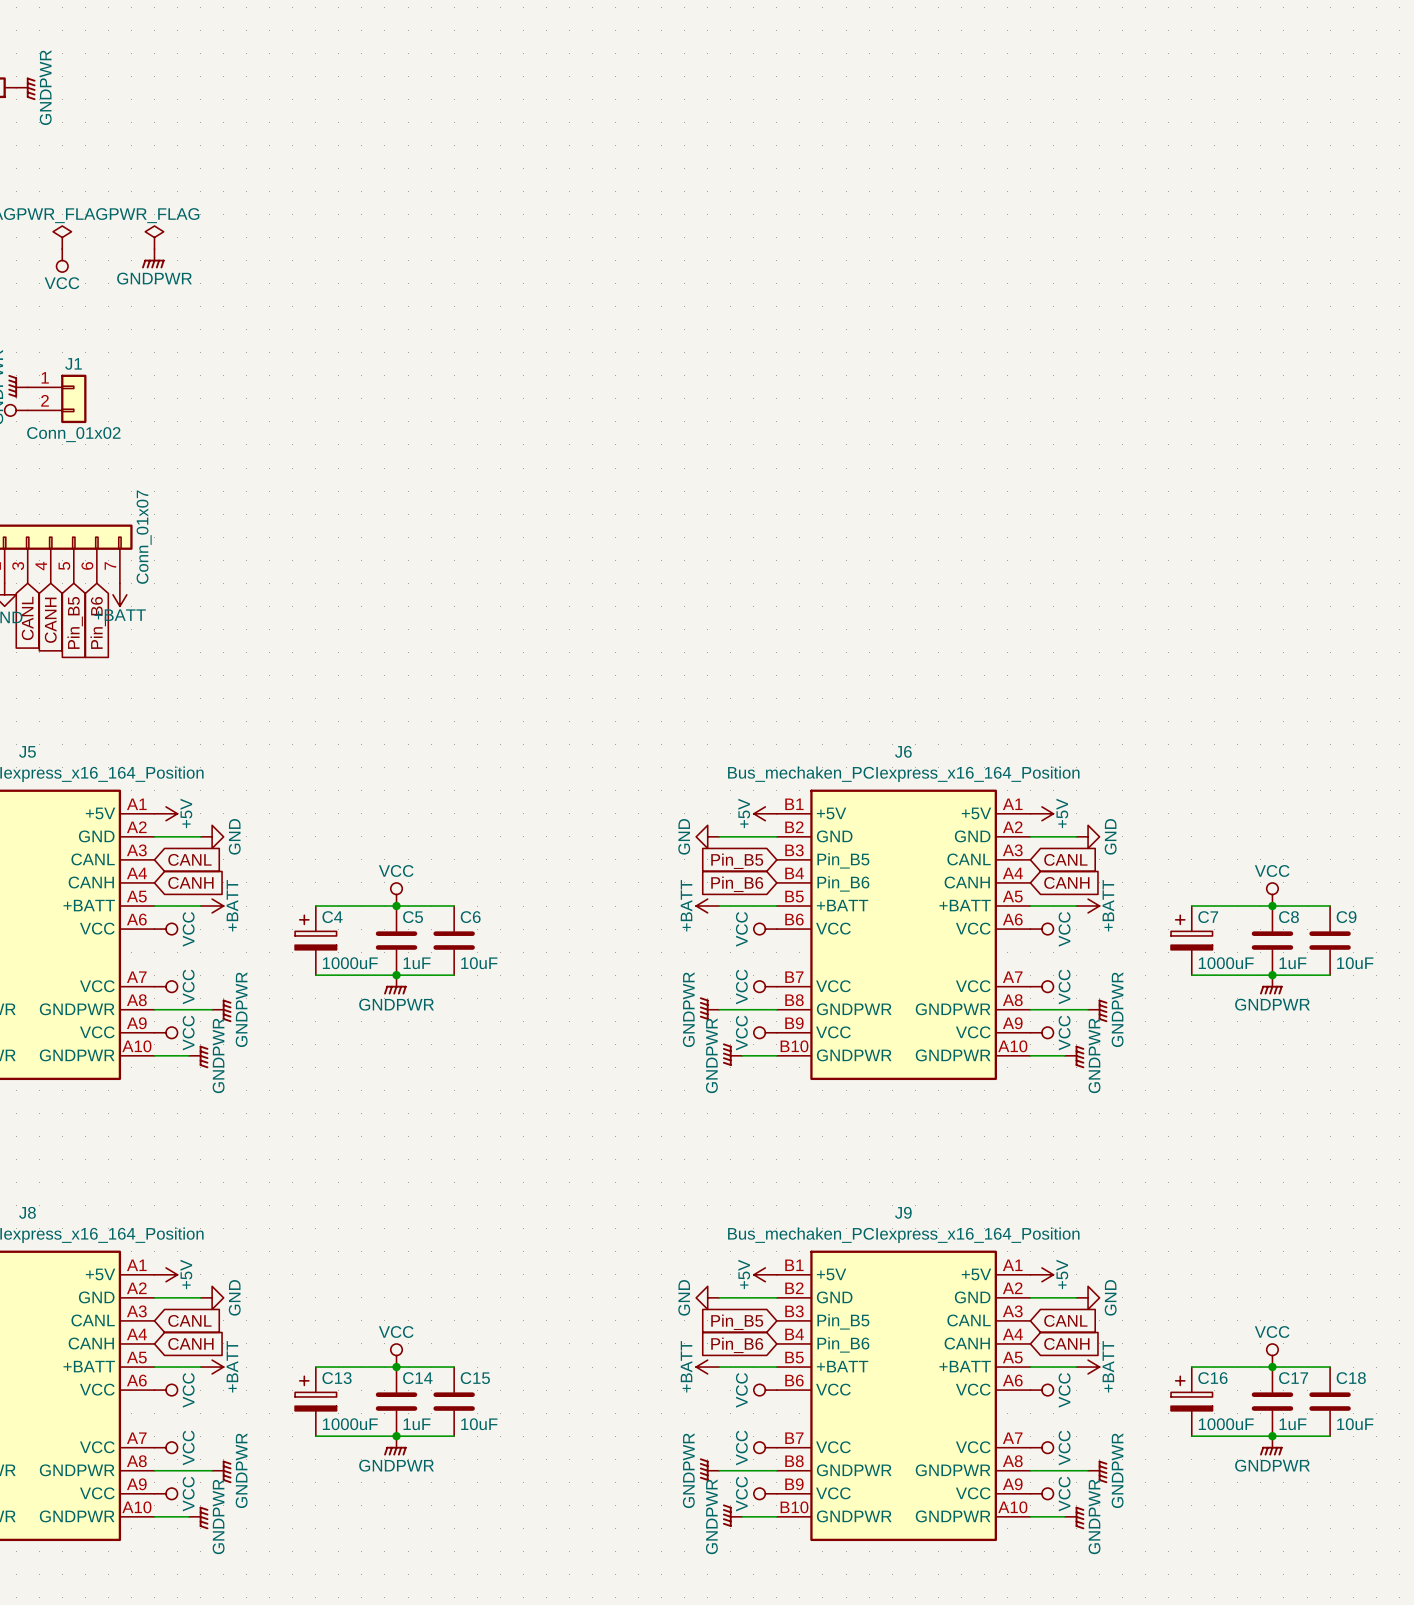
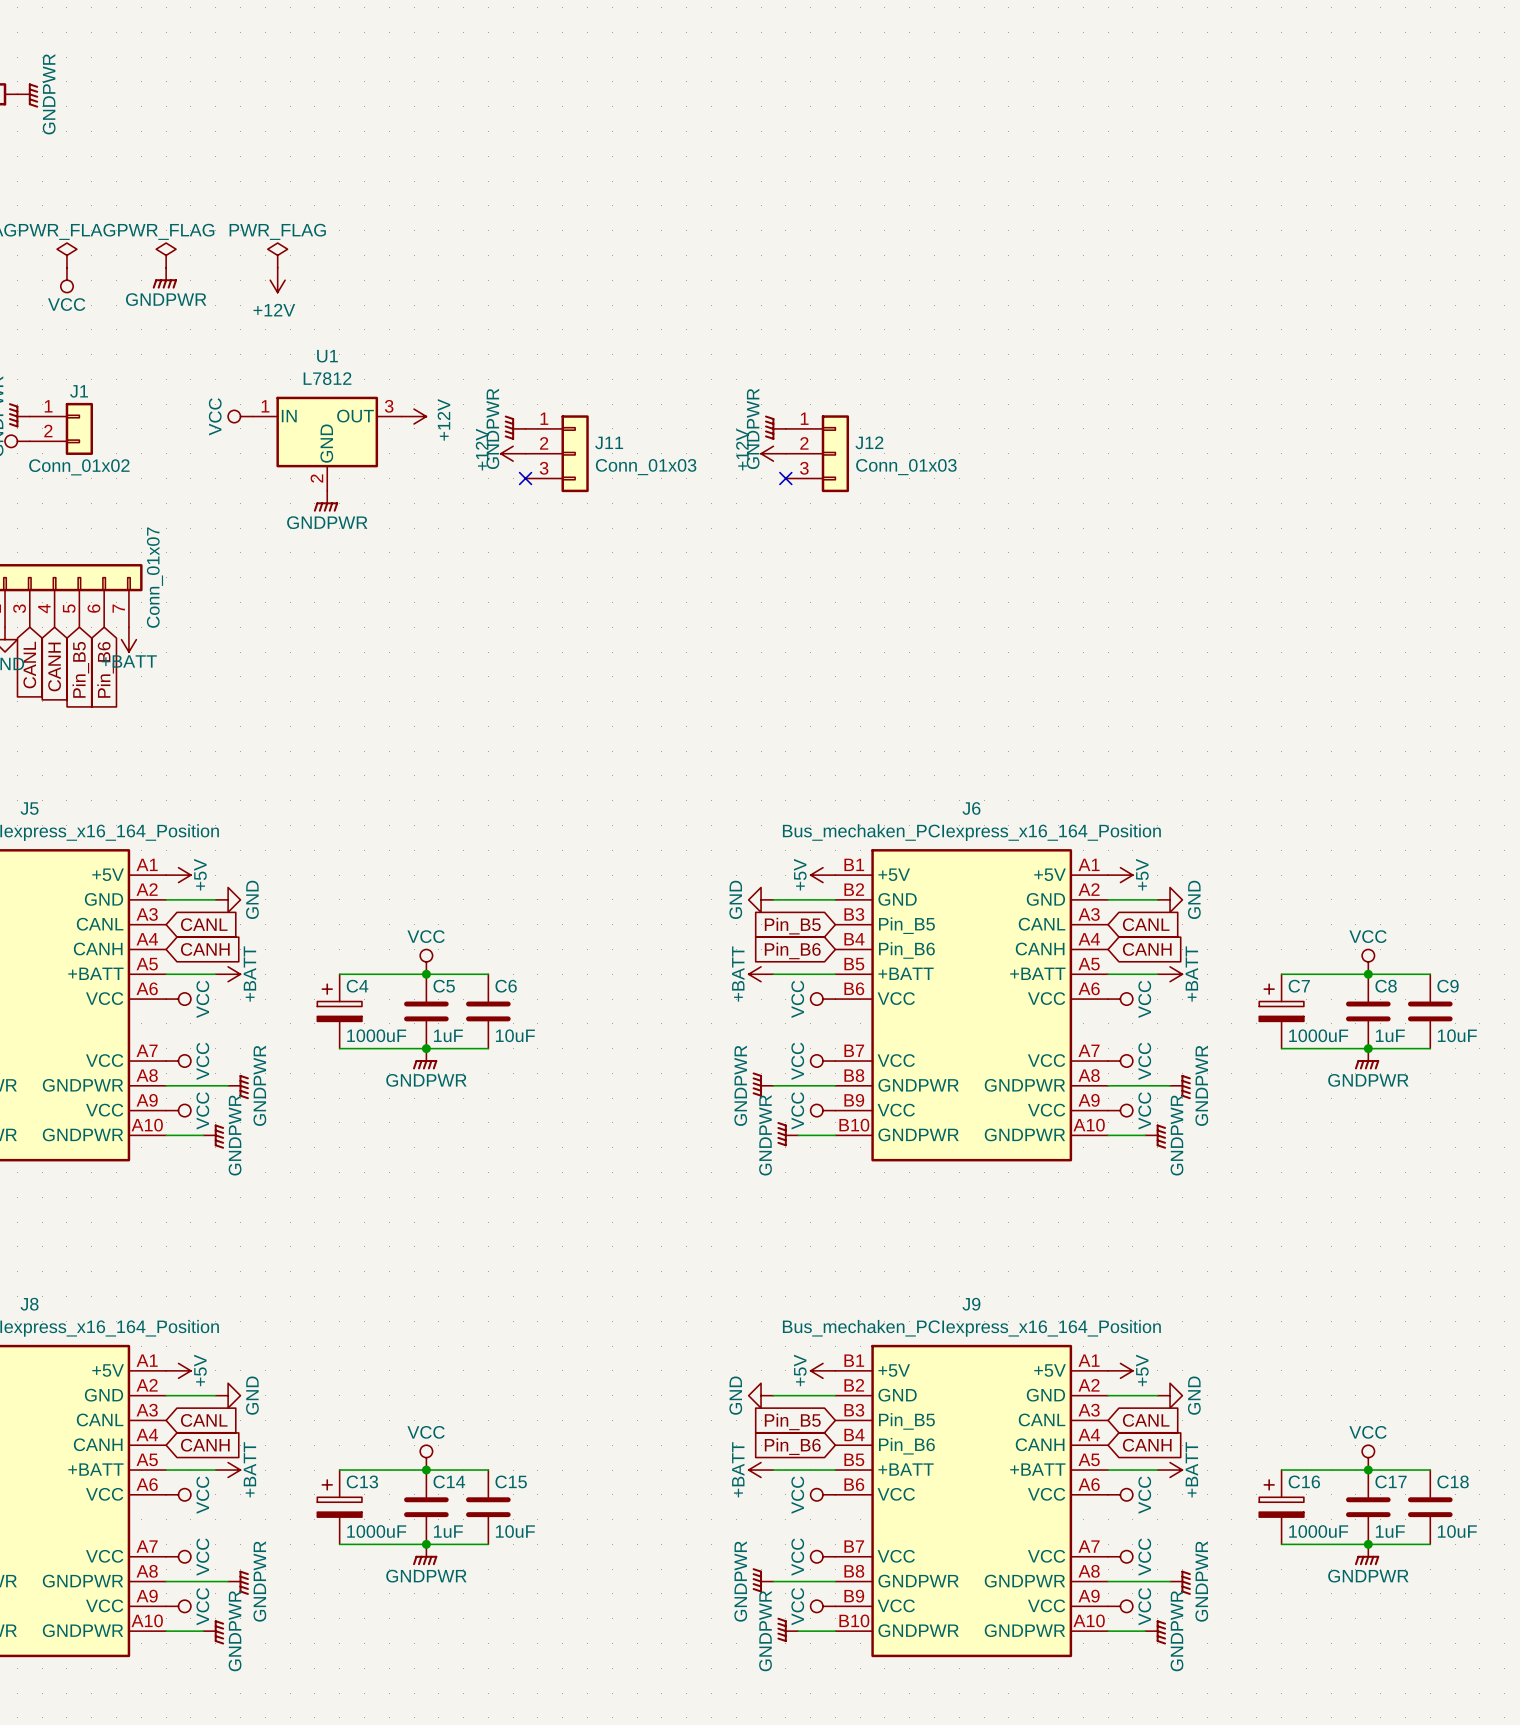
power symbol: none -> PWR_FLAG (277, 255)
power symbol: none -> +12V (277, 280)
power symbol: none -> VCC (240, 416)
power symbol: none -> +12V (414, 416)
power symbol: none -> GNDPWR (515, 427)
power symbol: none -> GNDPWR (775, 427)
U1: none -> L7812 (327, 443)
power symbol: none -> +12V (513, 453)
J11: none -> Conn_01x03 (557, 453)
power symbol: none -> +12V (773, 453)
J12: none -> Conn_01x03 (817, 453)
no-connect mark: none -> (525, 478)
no-connect mark: none -> (785, 478)
power symbol: none -> GNDPWR (326, 501)

